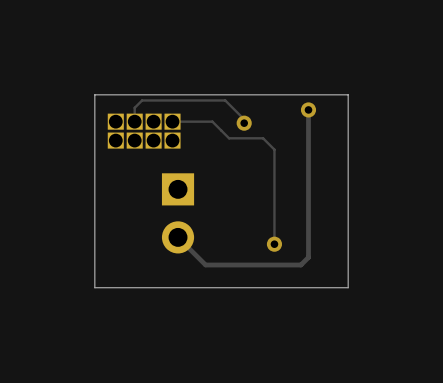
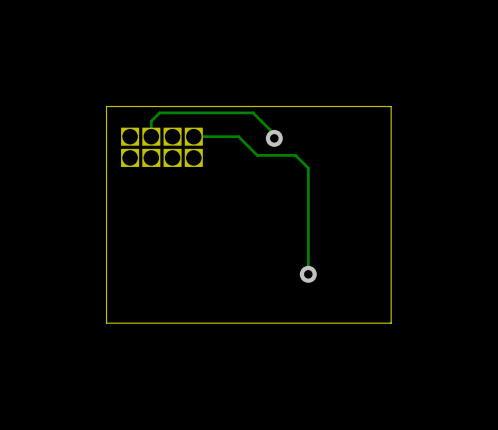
track: (308, 109) (308, 257) (300, 265) (205, 265) (178, 237) -> none
via: (308, 109) -> none
part: (178, 213) -> none

